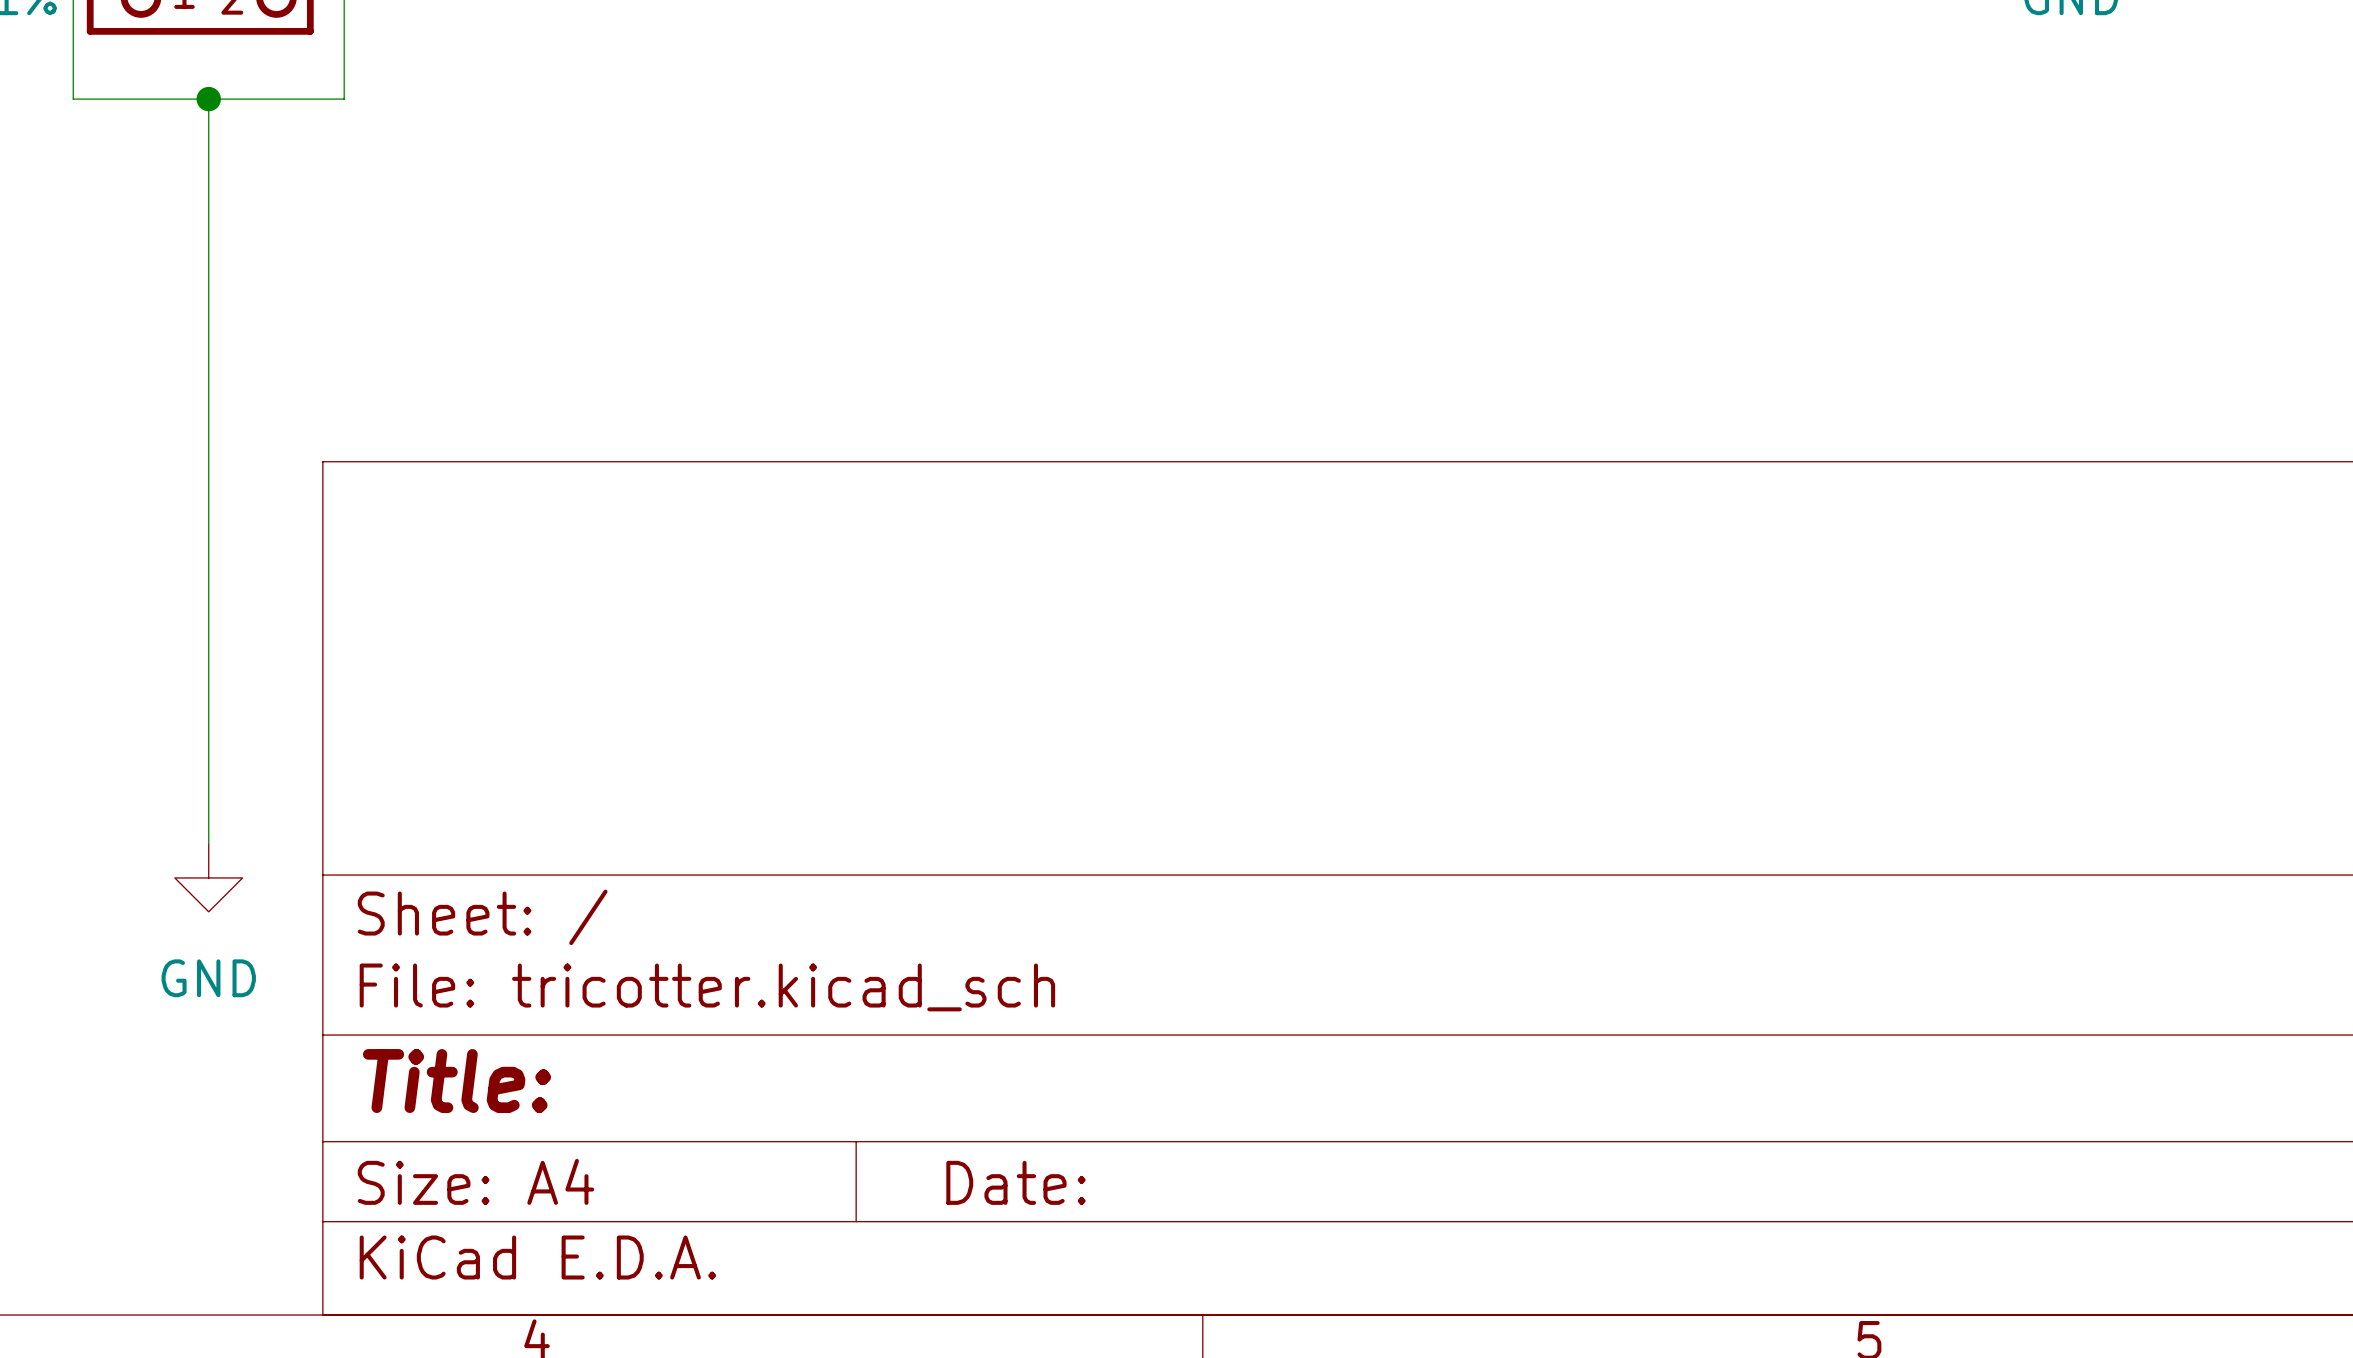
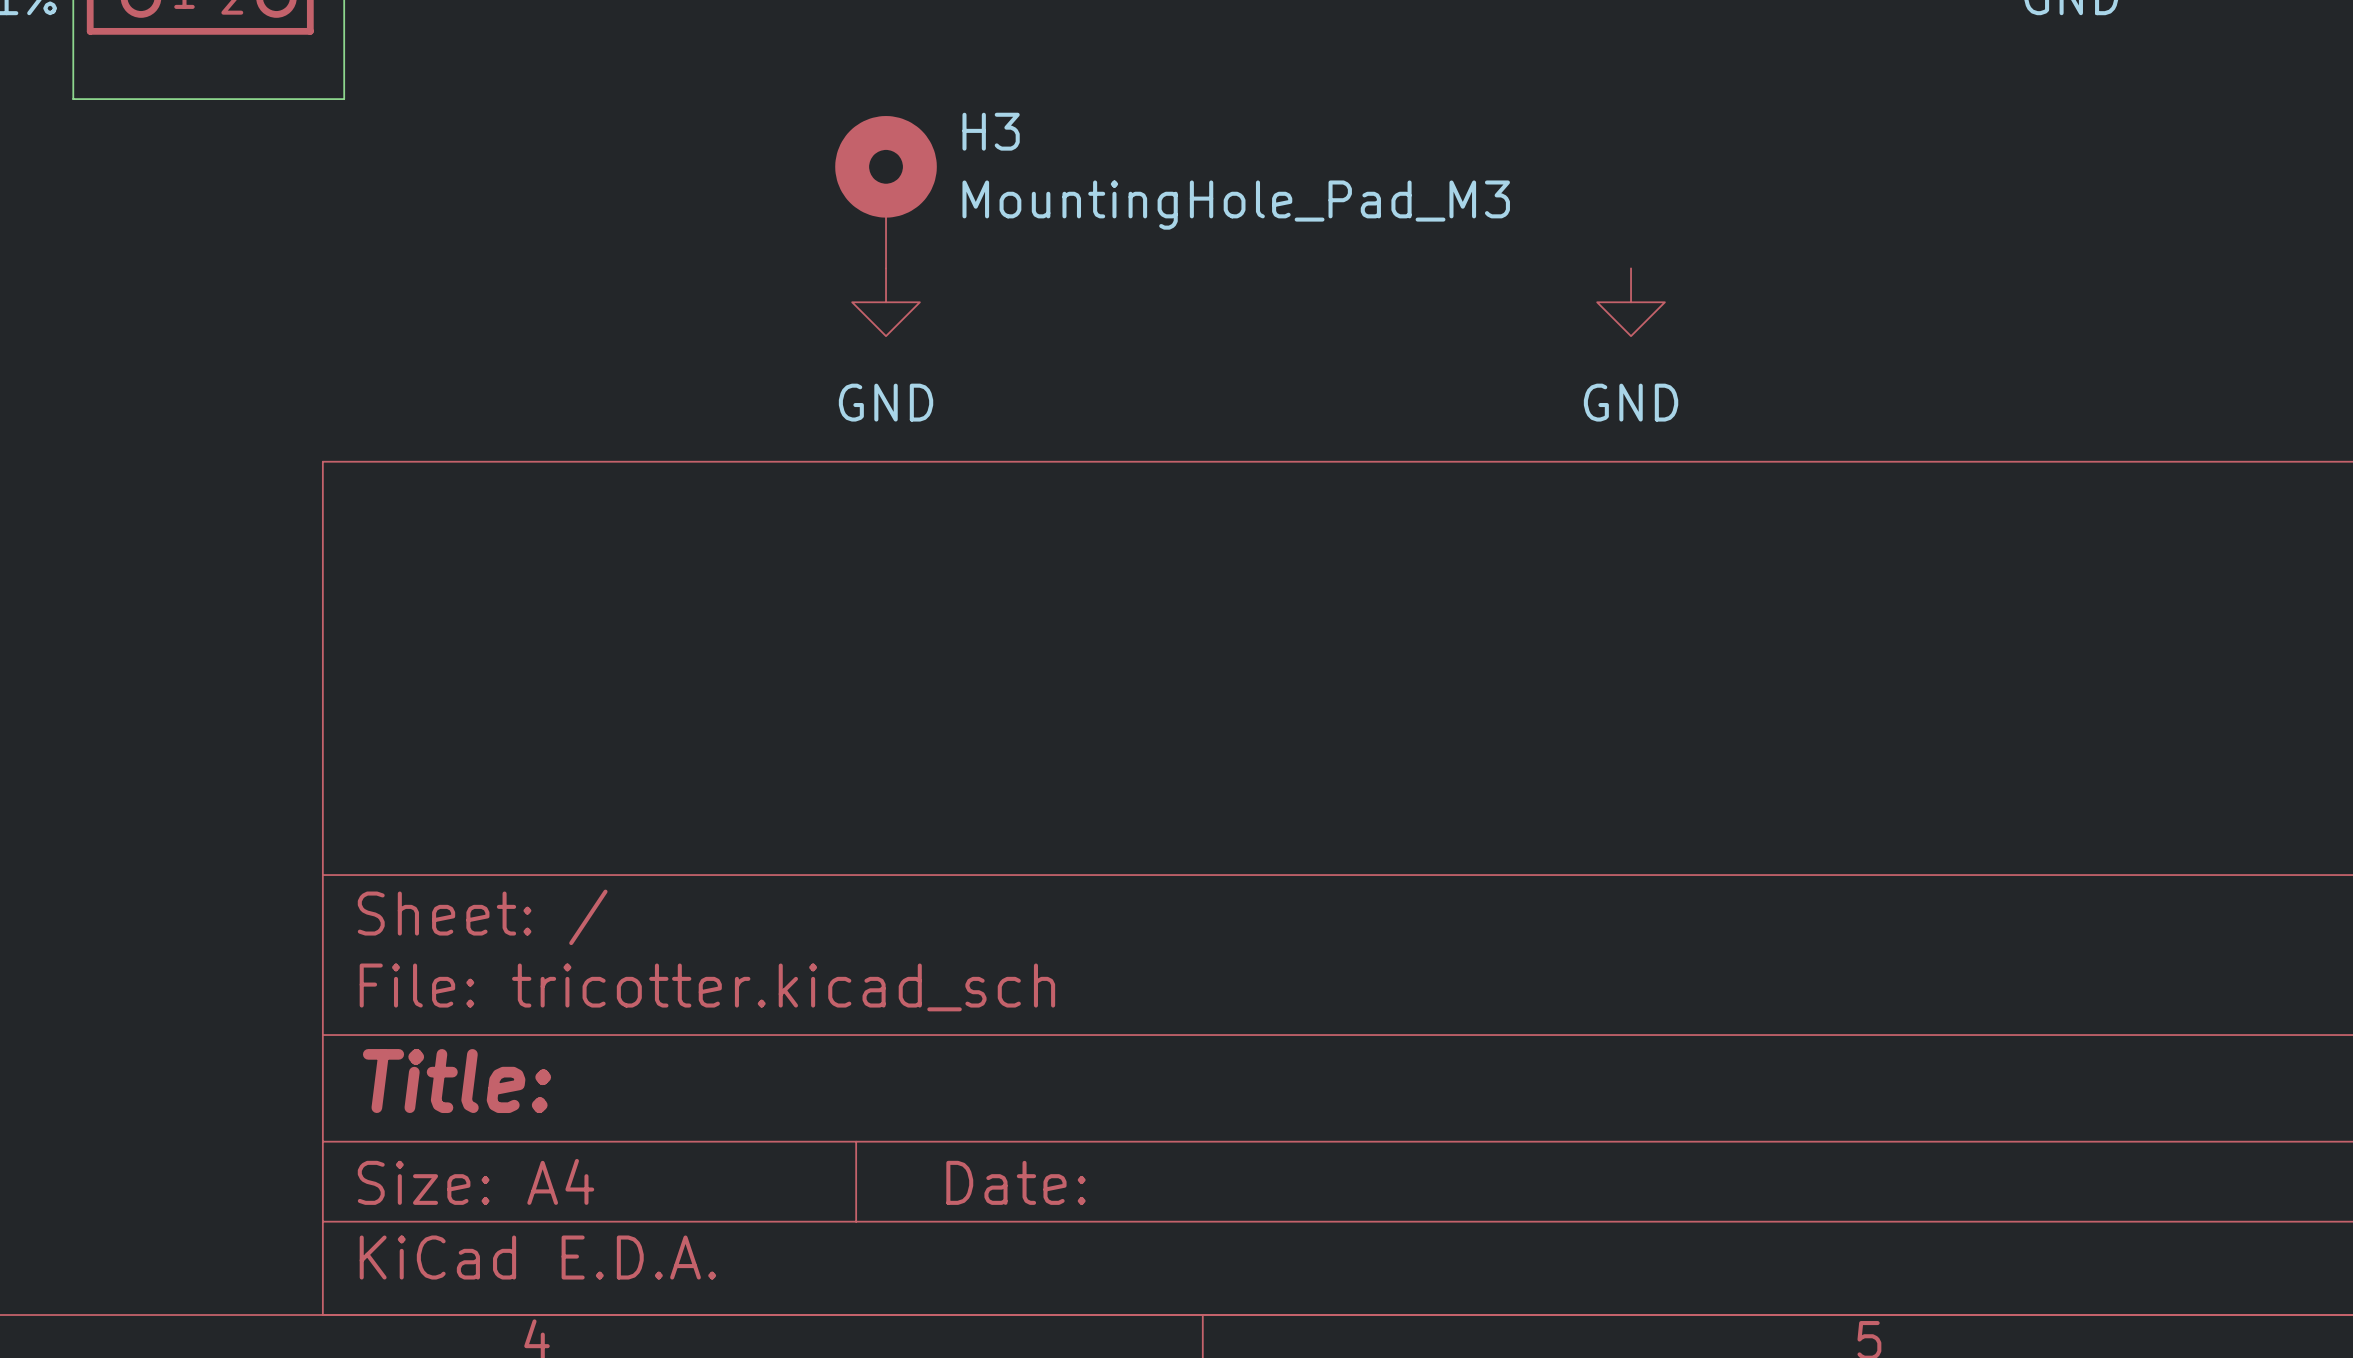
wire: (208, 99) (208, 844) -> none
junction: (208, 99) -> none
H3: none -> MountingHole_Pad_M3 (886, 192)
power symbol: none -> GND (886, 302)
power symbol: none -> GND (1631, 302)
power symbol: GND (208, 877) -> none

